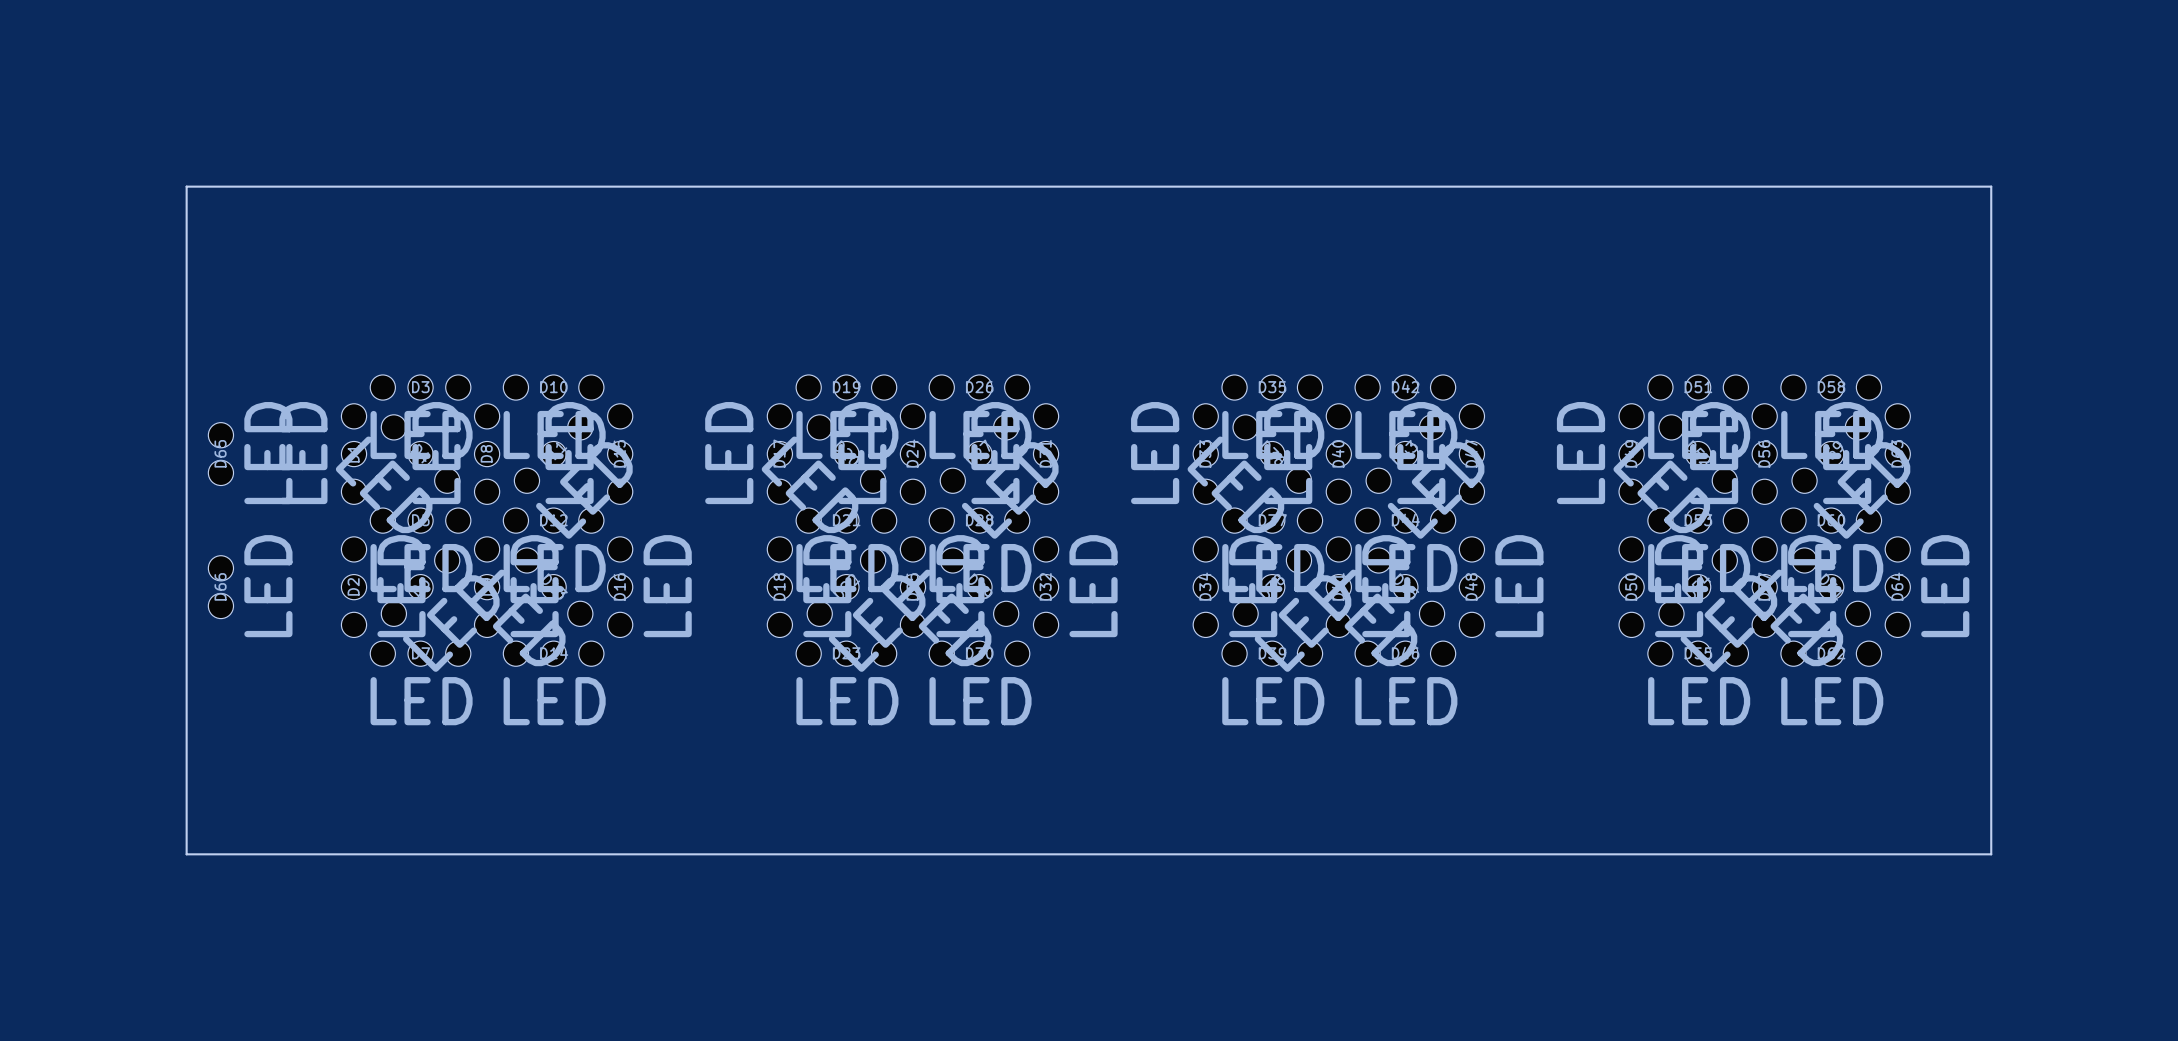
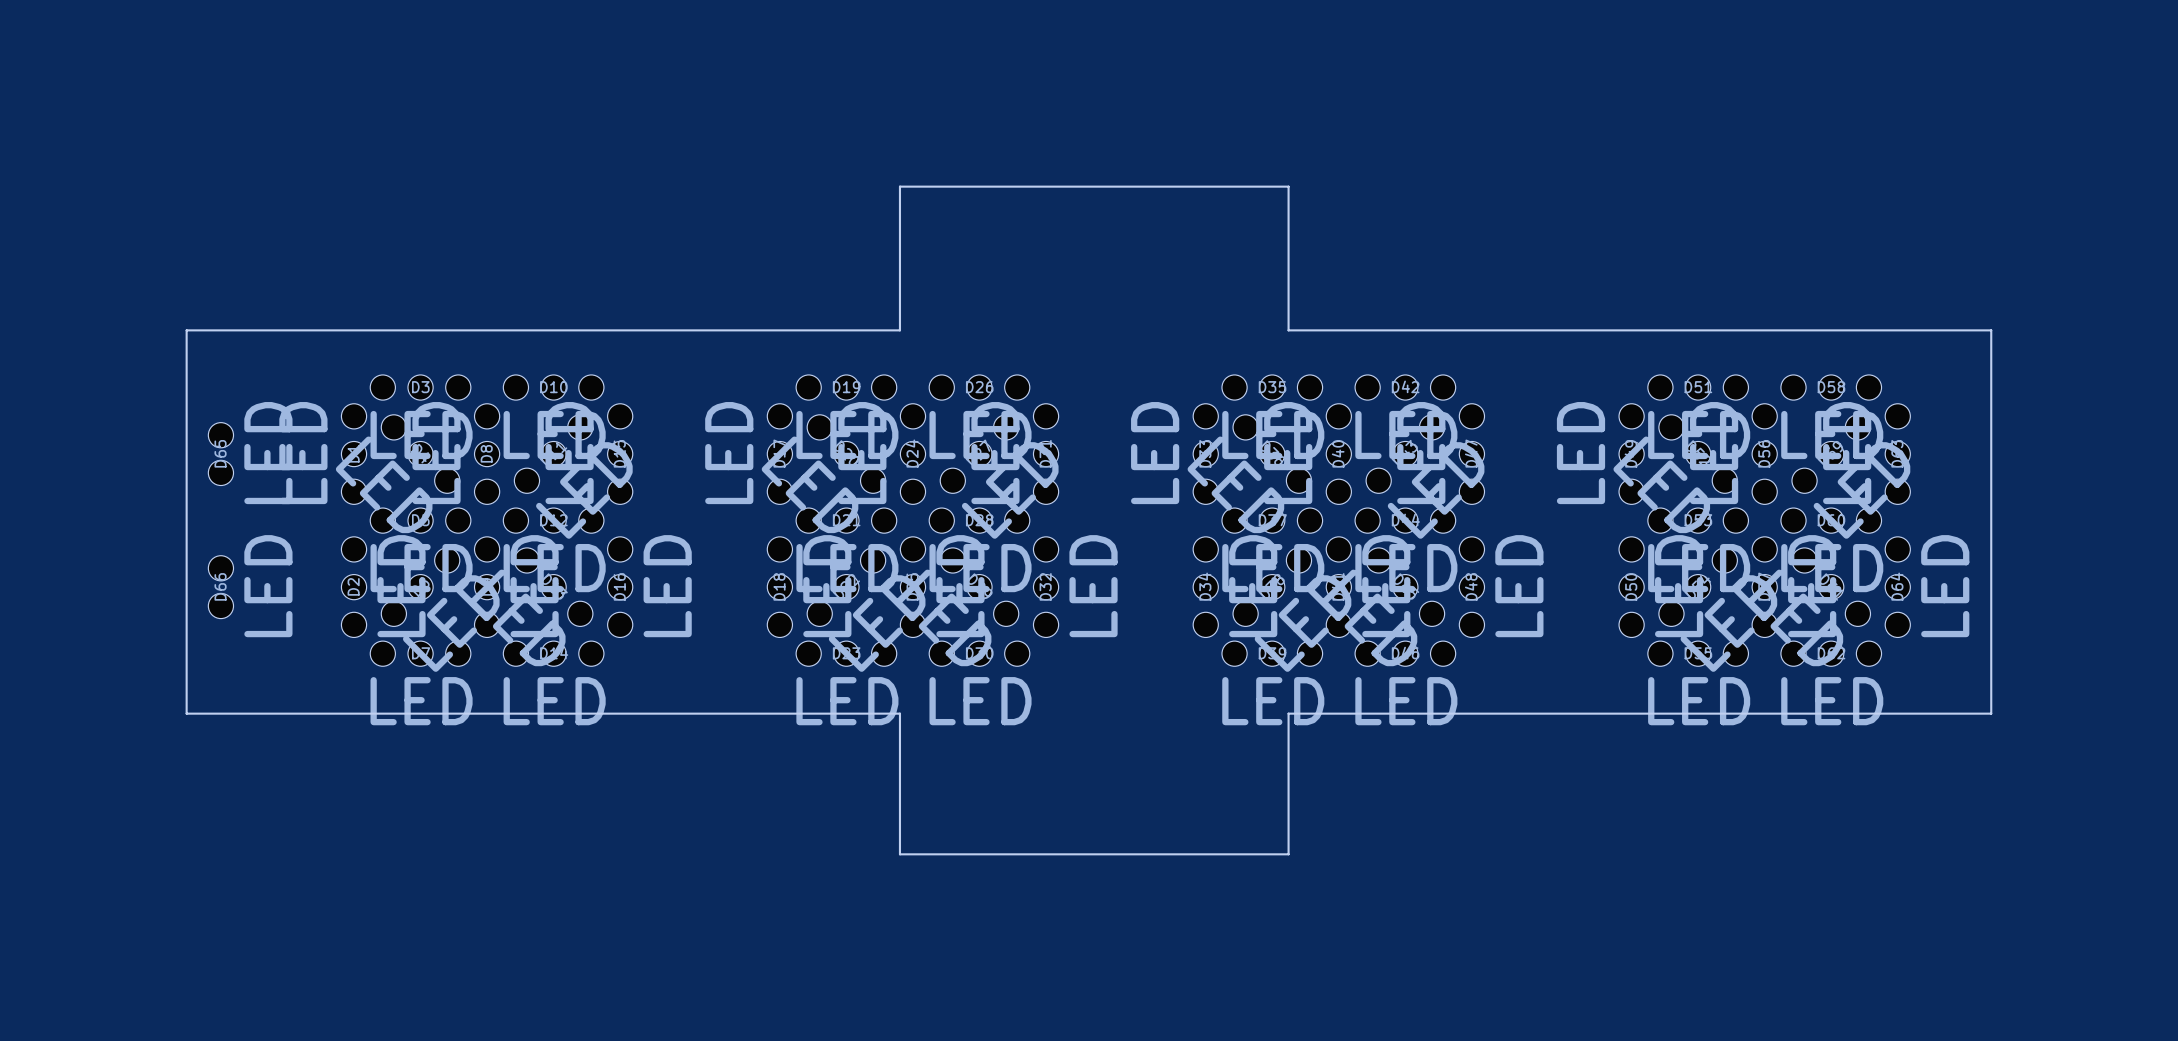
board edge: (899, 186) (186, 186) (186, 330) -> (899, 186) (899, 330) (186, 330)
board edge: (1288, 186) (1991, 186) (1991, 330) -> (1288, 186) (1288, 330) (1991, 330)
board edge: (186, 713) (186, 854) (899, 854) -> (186, 713) (899, 713) (899, 854)
board edge: (1991, 713) (1991, 854) (1288, 854) -> (1991, 713) (1288, 713) (1288, 854)

